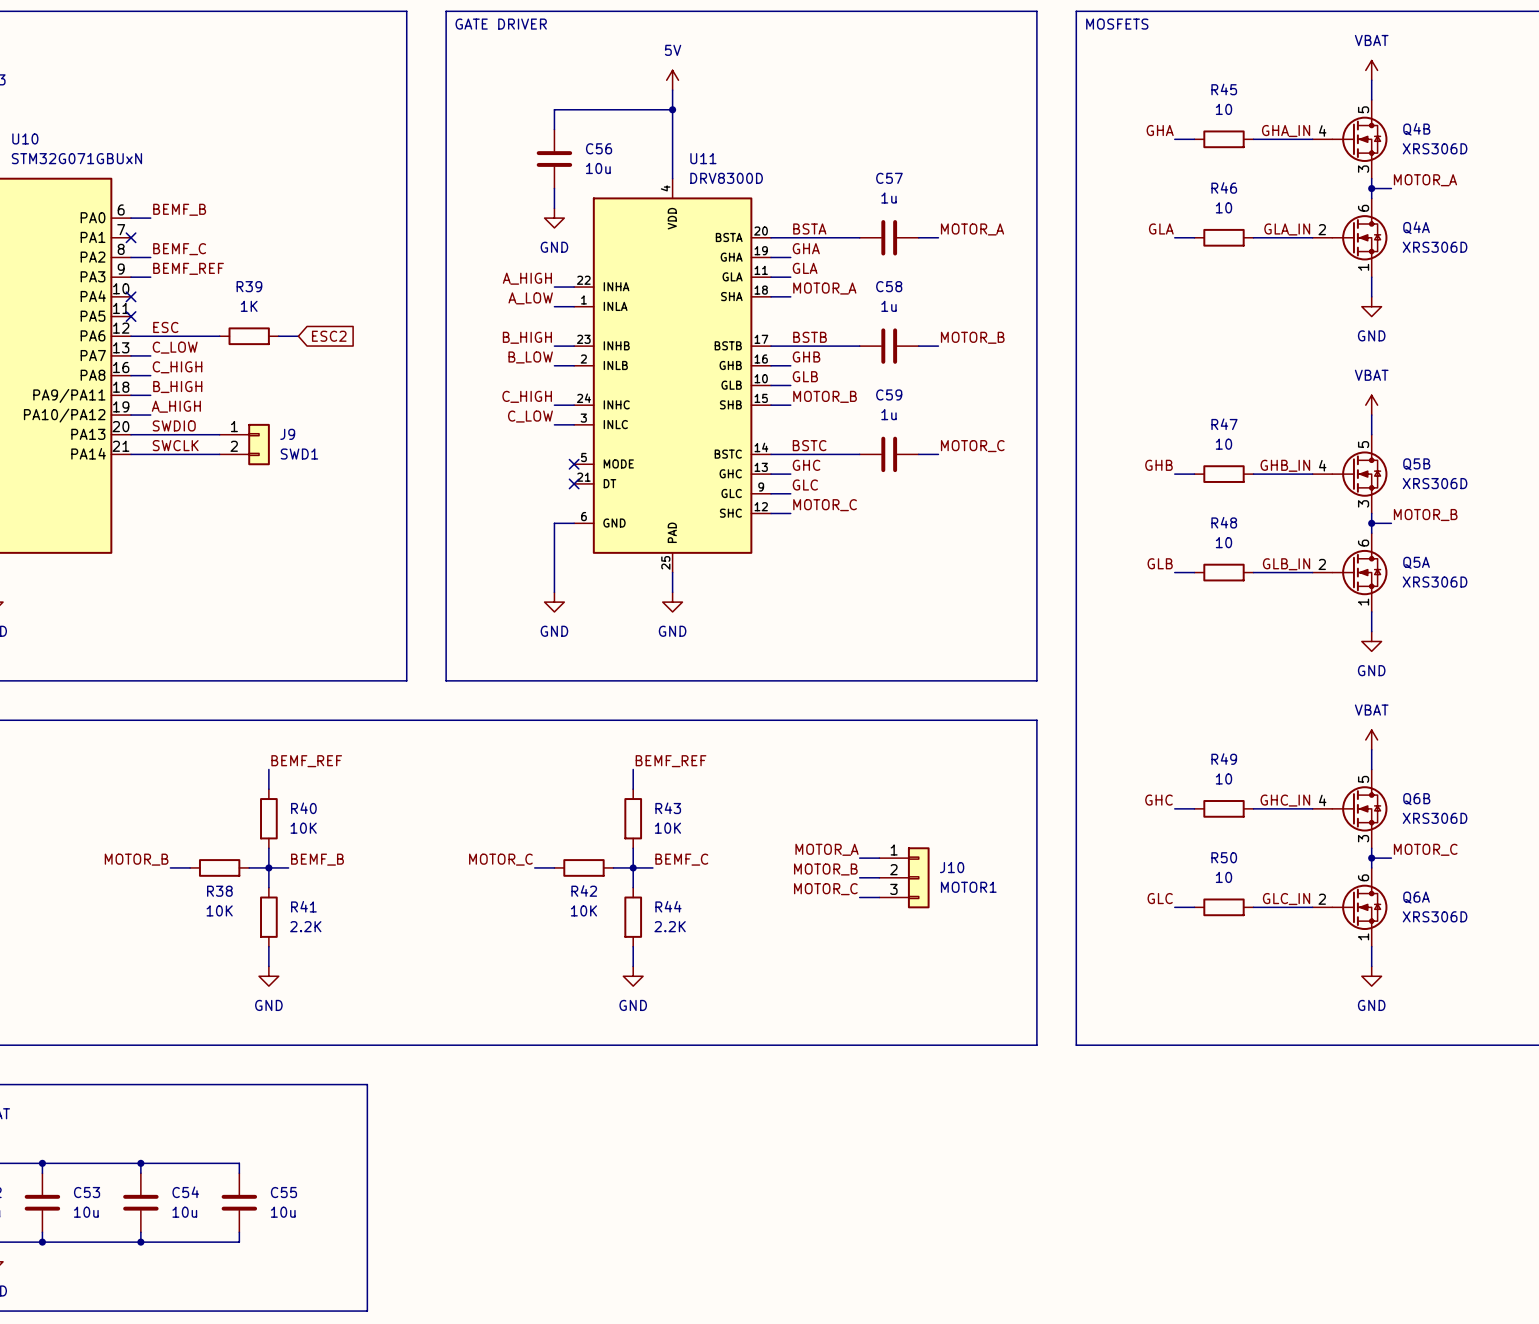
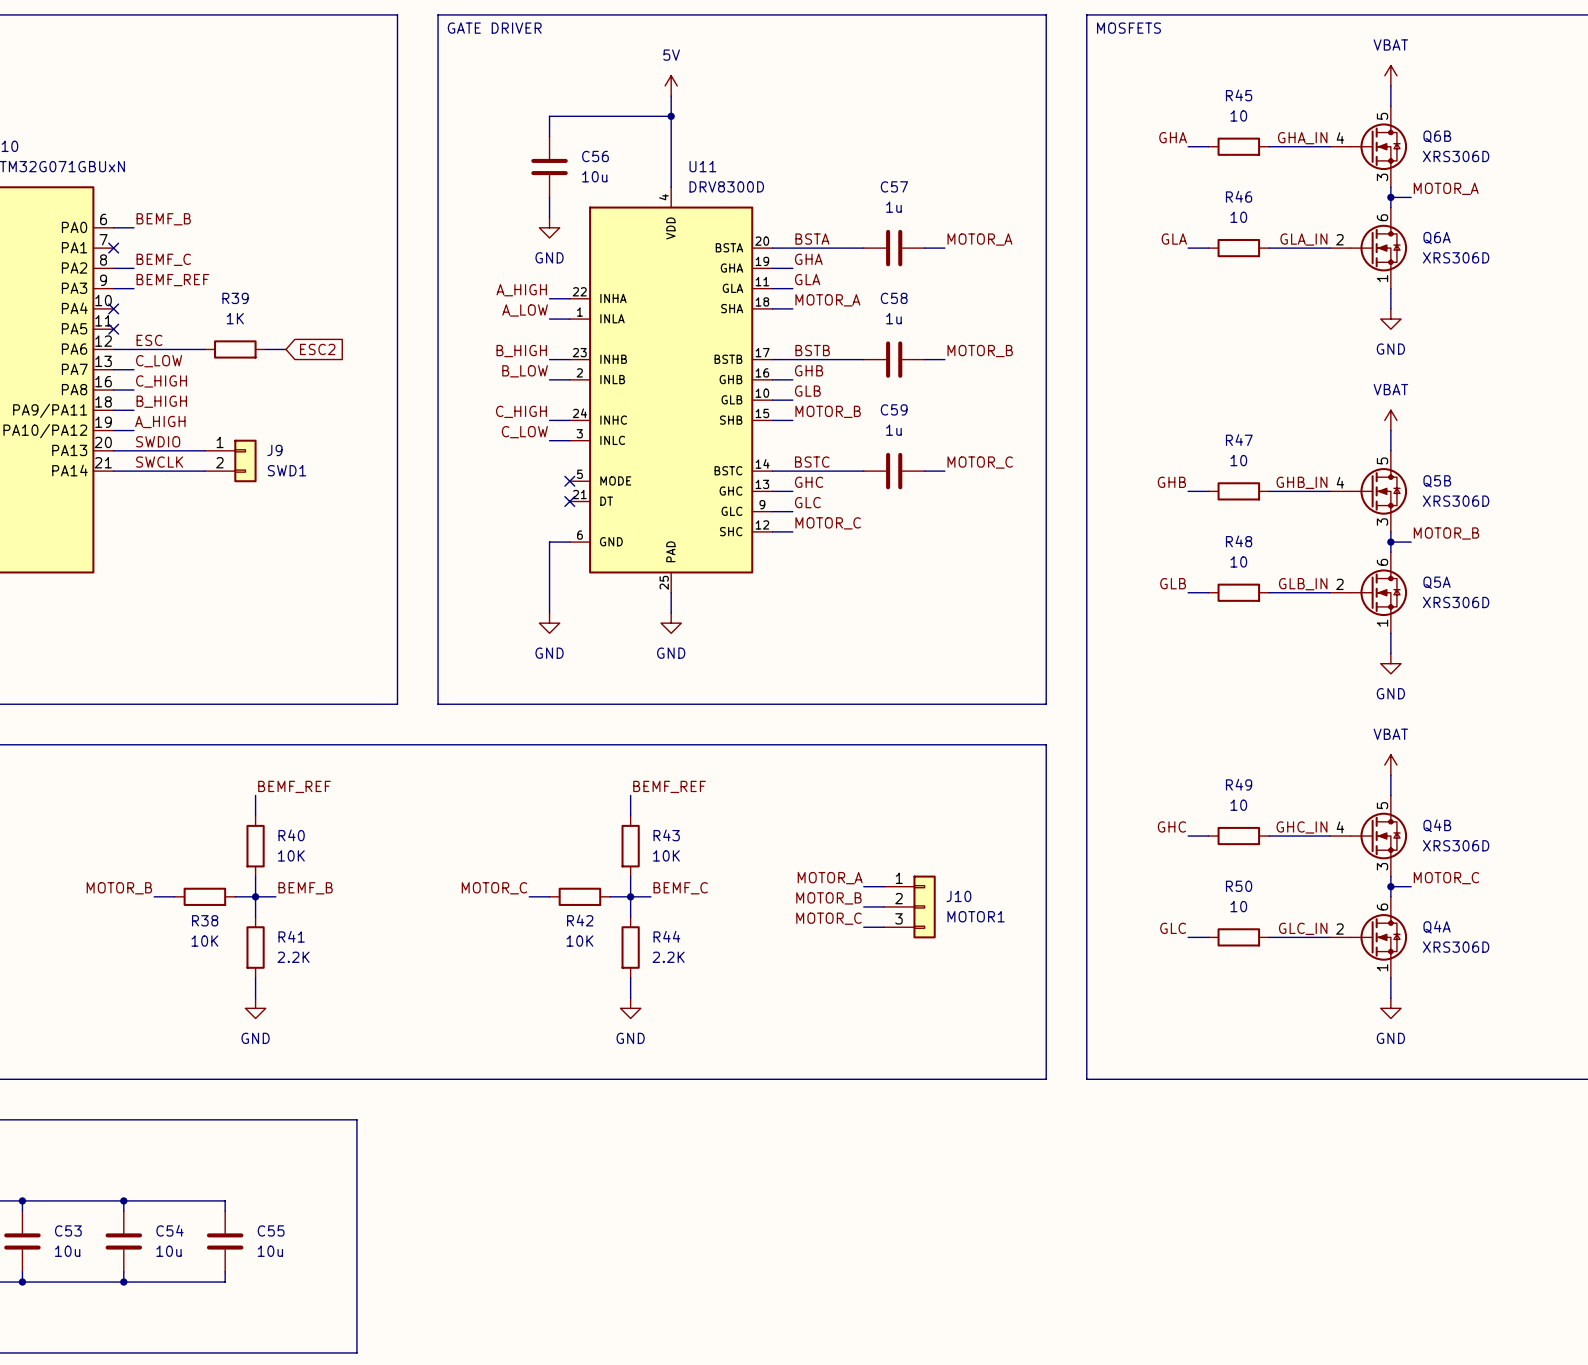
Q4B name: Q4B (1416, 129) -> Q6B (1437, 136)
Q4A name: Q4A (1416, 227) -> Q6A (1437, 238)
Q6B name: Q6B (1416, 799) -> Q4B (1437, 825)
Q6A name: Q6A (1416, 897) -> Q4A (1437, 927)

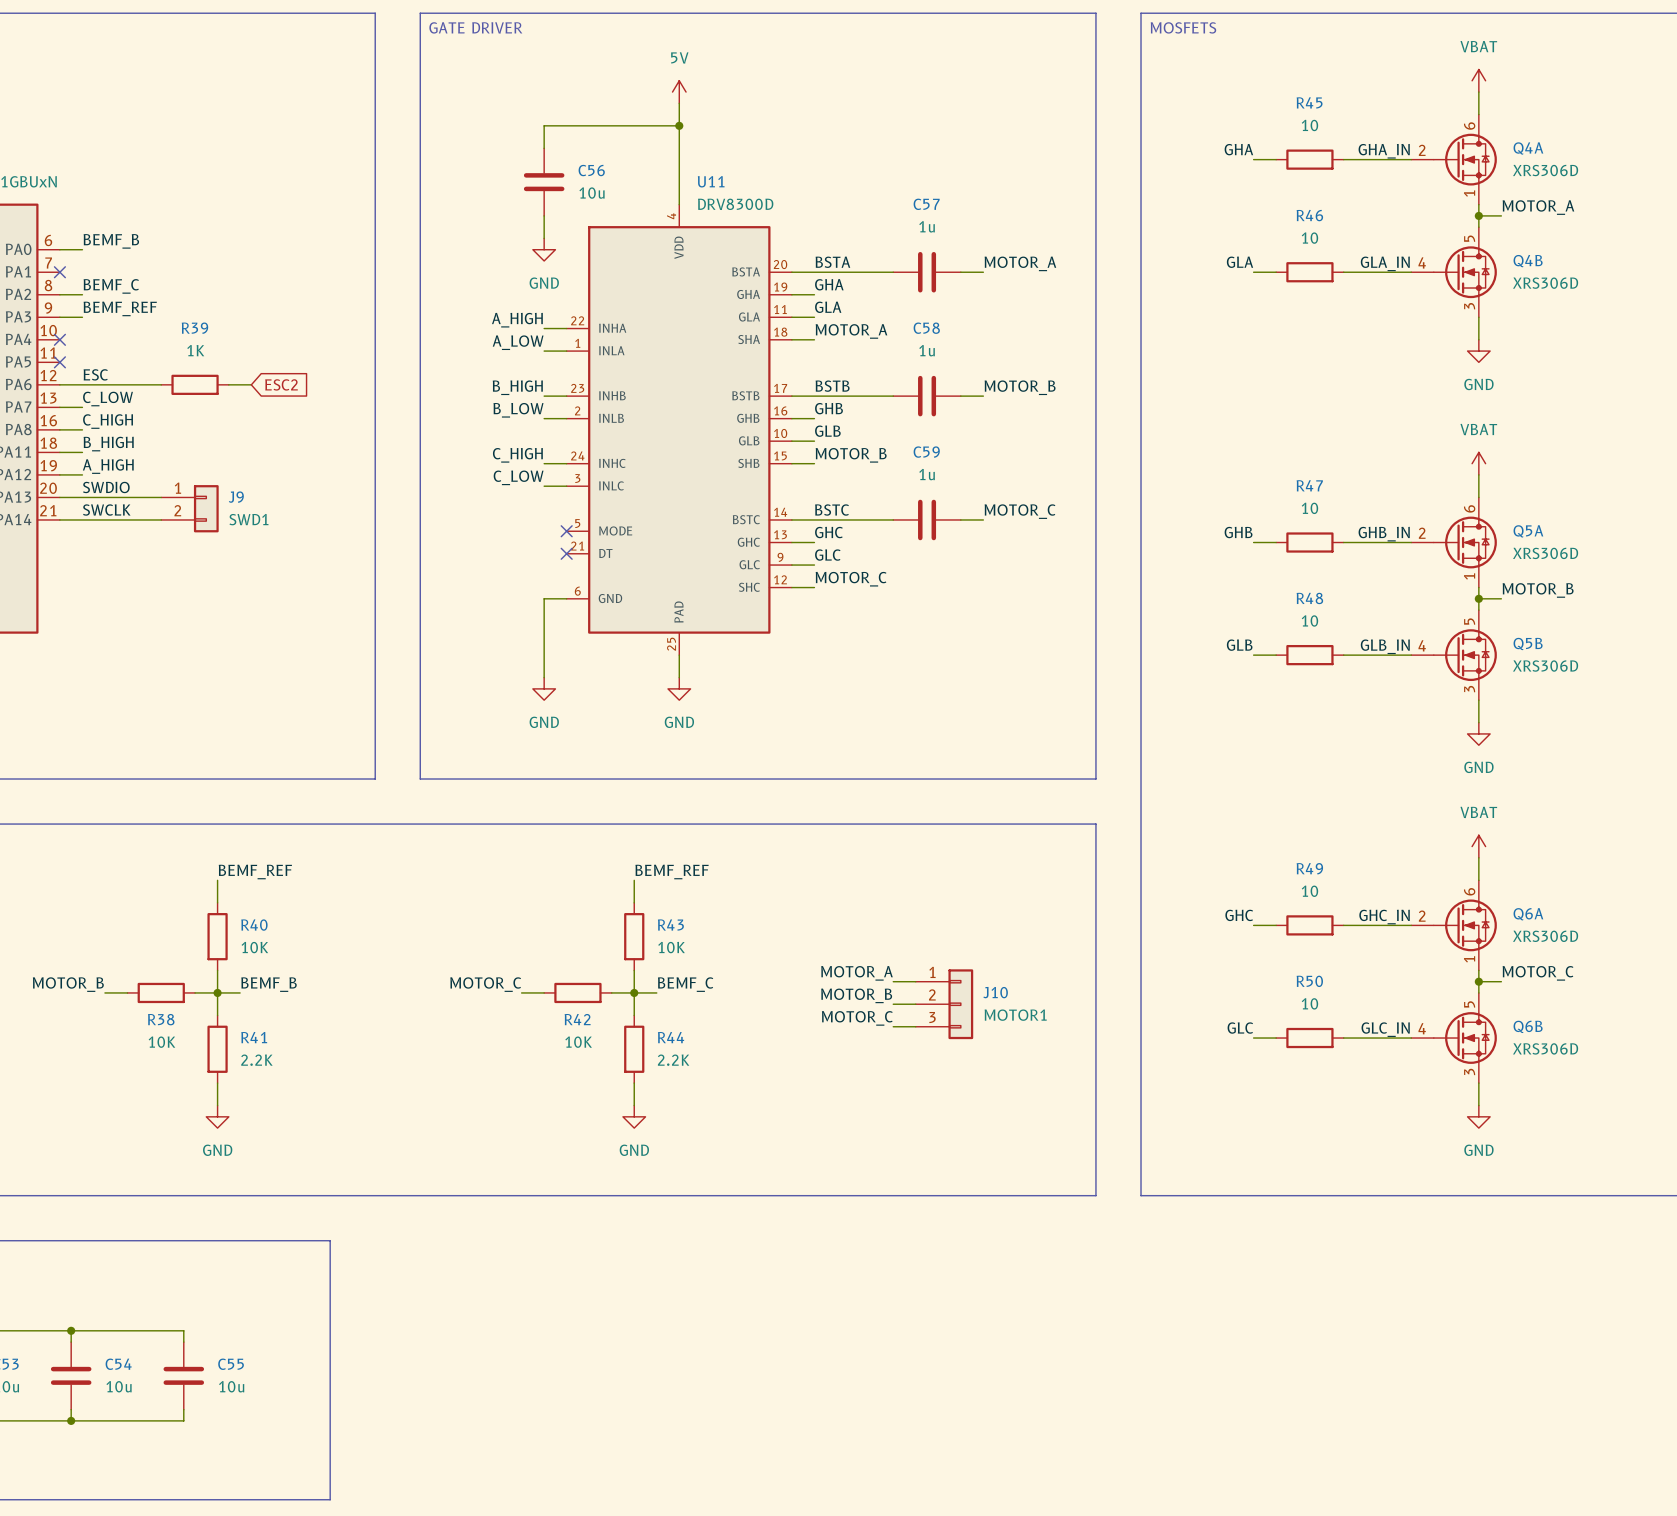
Q6B position: (1368, 146) -> (1454, 1038)
Q6A position: (1368, 248) -> (1454, 925)
Q5B position: (1368, 491) -> (1454, 655)
Q5A position: (1368, 592) -> (1454, 542)
Q4B position: (1368, 836) -> (1454, 272)
Q4A position: (1368, 937) -> (1454, 159)

